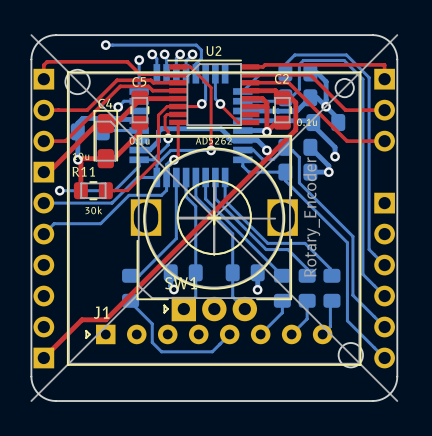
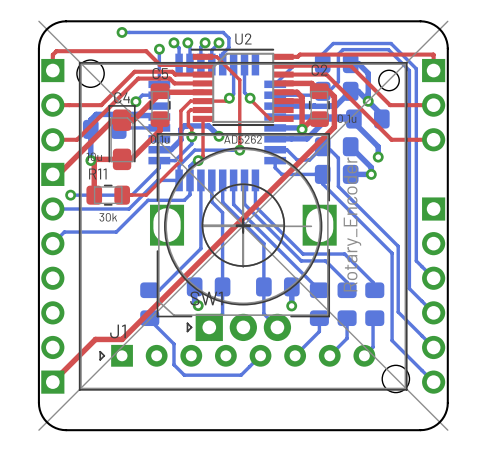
bottom track: (183, 128) (221, 128) (229, 138) (242, 140) -> (208, 125) (218, 136)
via: none -> (218, 136)
bottom track: (257, 140) (266, 150) -> (291, 138) (307, 138) (326, 119) (353, 119)
via: (266, 150) -> none

